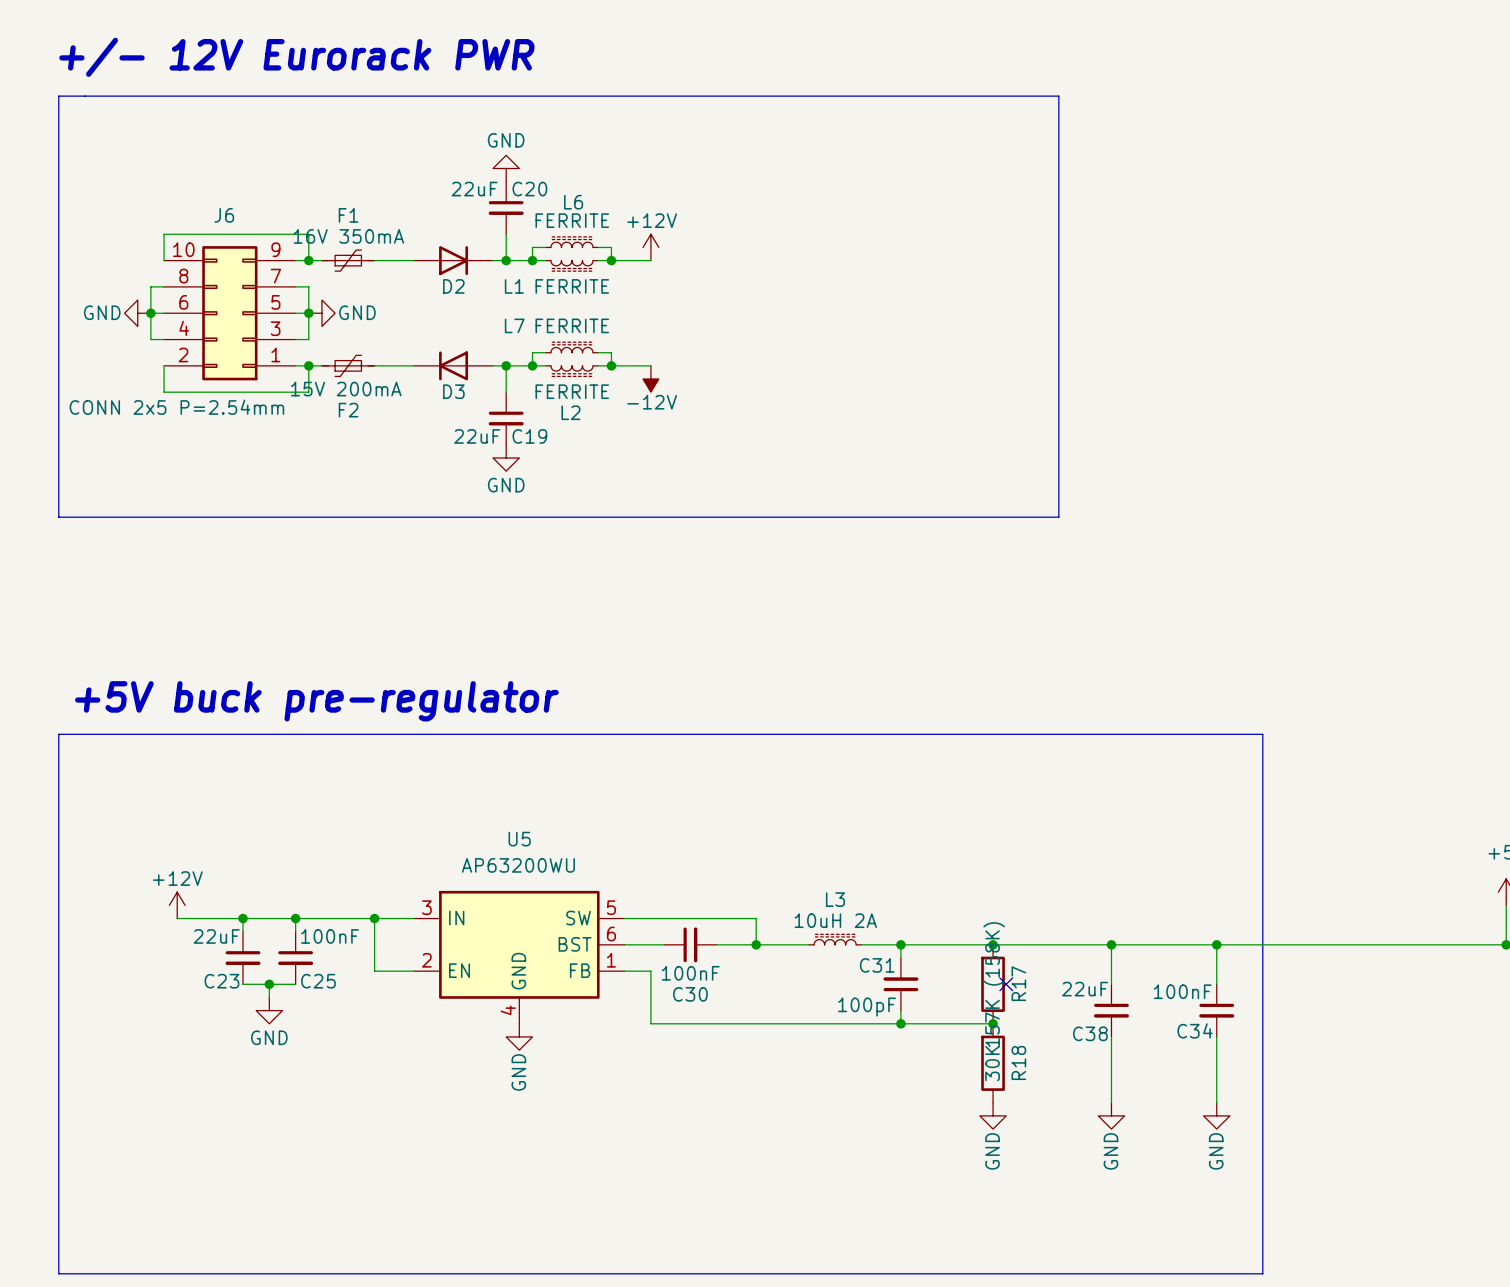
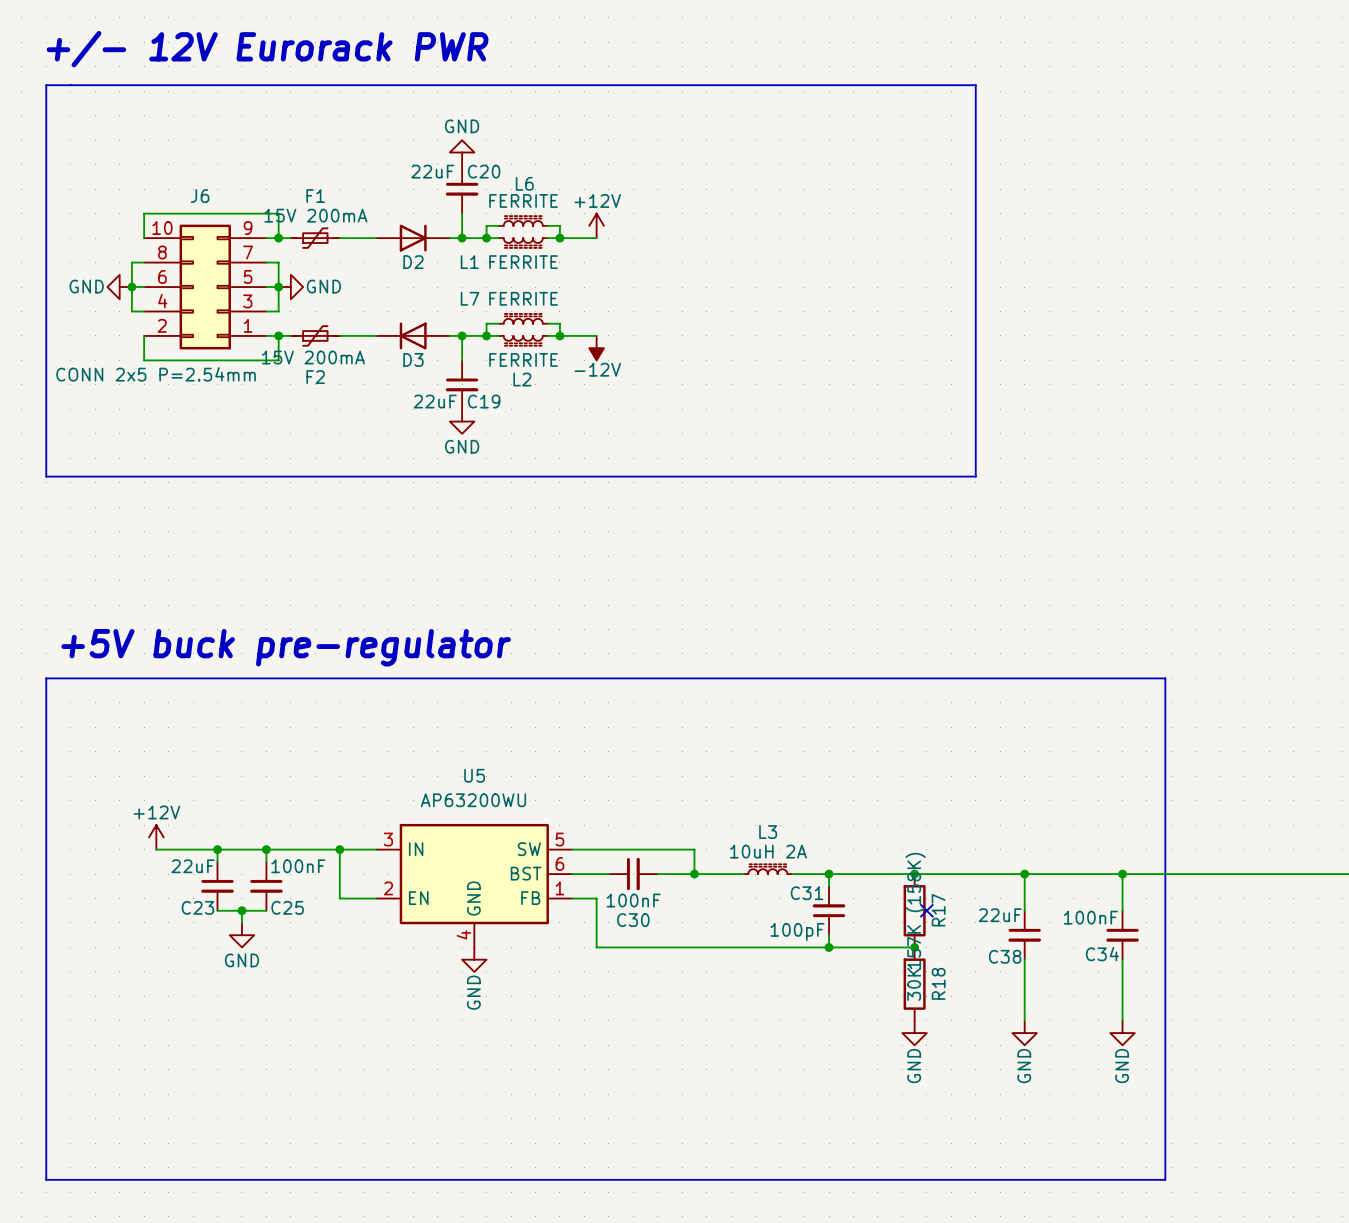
F1 value: 16V 350mA (348, 236) -> 15V 200mA (315, 215)

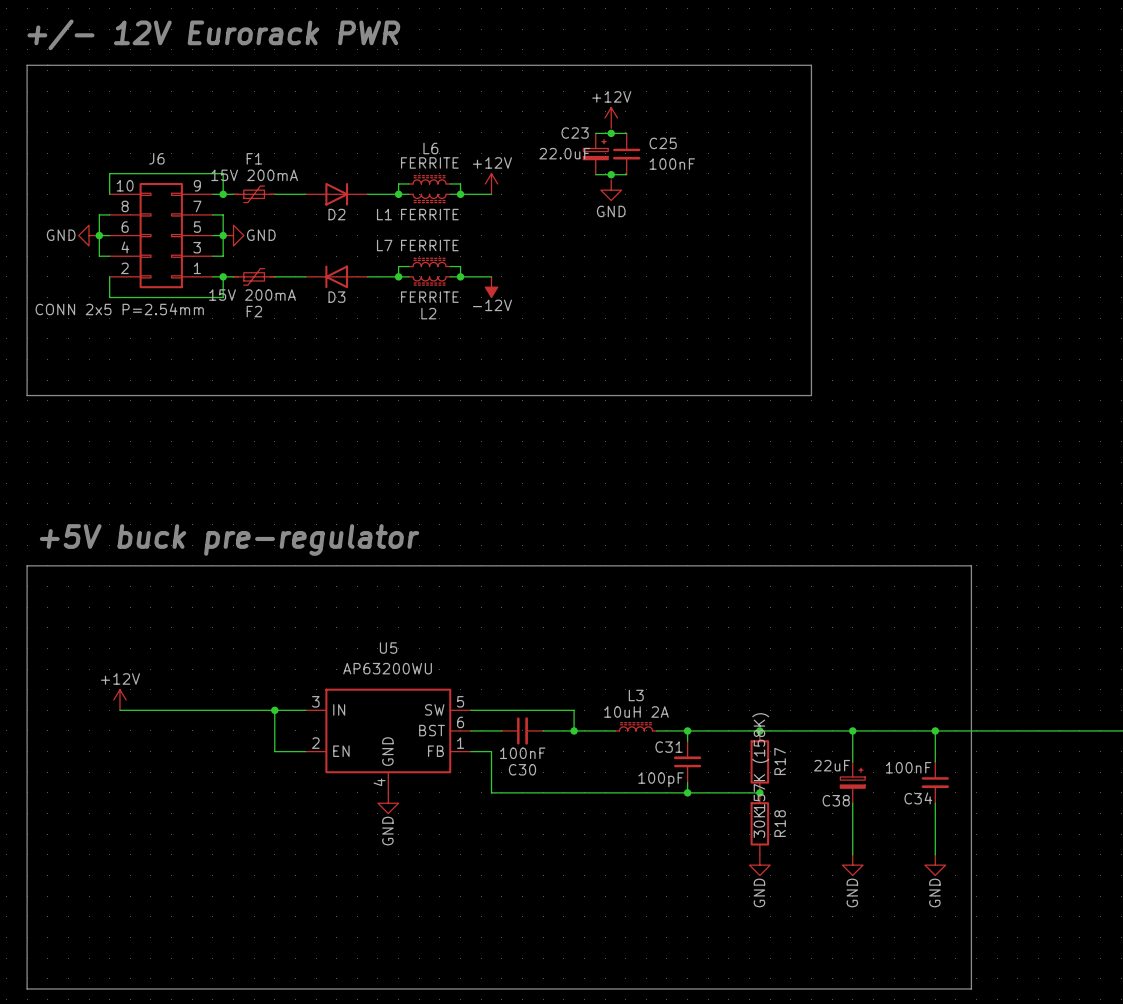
power symbol: none -> +12V (611, 117)
power symbol: GND (462, 152) -> none
wire: none -> (595, 133) (626, 133)
junction: none -> (611, 133)
C20: 22uF (462, 189) -> none
wire: (462, 213) (462, 238) -> none
wire: none -> (595, 174) (626, 174)
junction: none -> (611, 174)
power symbol: none -> GND (611, 190)
junction: (462, 238) -> none
wire: (462, 335) (462, 360) -> none
junction: (462, 335) -> none
C19: 22uF (462, 384) -> none
power symbol: GND (462, 421) -> none
wire: (217, 849) (217, 861) -> none
junction: (217, 849) -> none
wire: (266, 849) (266, 861) -> none
junction: (266, 849) -> none
C23 symbol: [201, 861, 234, 911] -> [583, 133, 609, 175]
C23 value: 22uF (193, 866) -> 22.0uF (564, 153)
C25 value position: 100nF (298, 866) -> 100nF (672, 164)
C25 position: (266, 886) -> (626, 154)
C23 name position: C23 (197, 907) -> C23 (575, 133)
C25 name position: C25 (287, 907) -> C25 (663, 143)
wire: (217, 910) (266, 910) -> none
wire: (241, 910) (241, 922) -> none
junction: (241, 910) -> none
no-connect mark: (926, 910) -> none
C38 symbol: [1008, 910, 1041, 960] -> [840, 761, 866, 804]
power symbol: GND (241, 935) -> none

